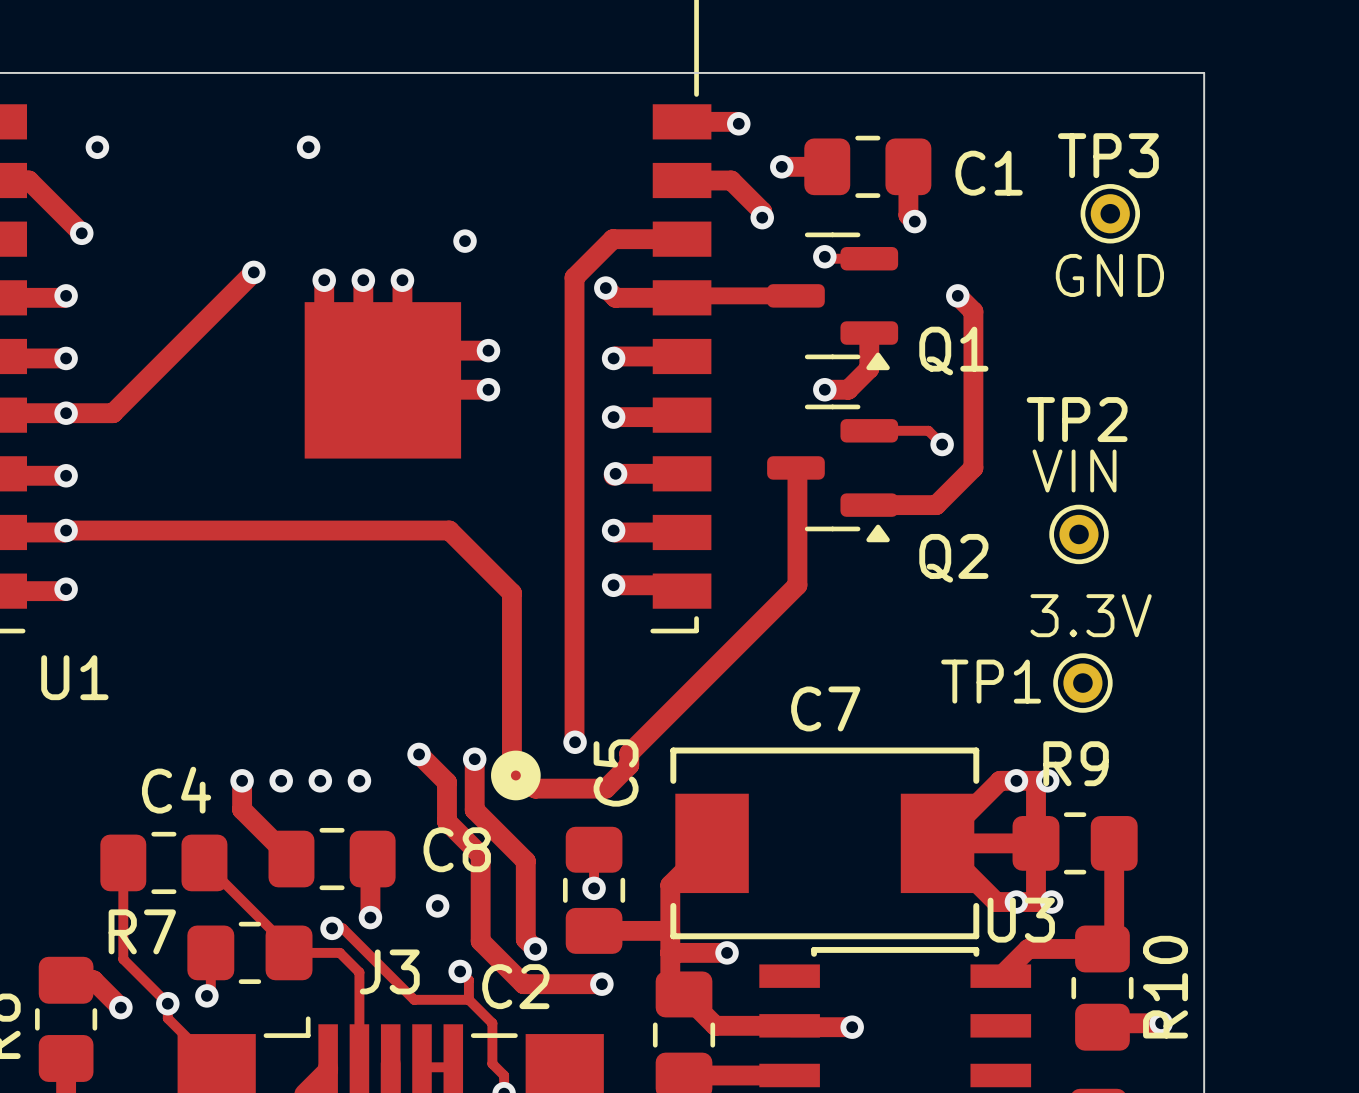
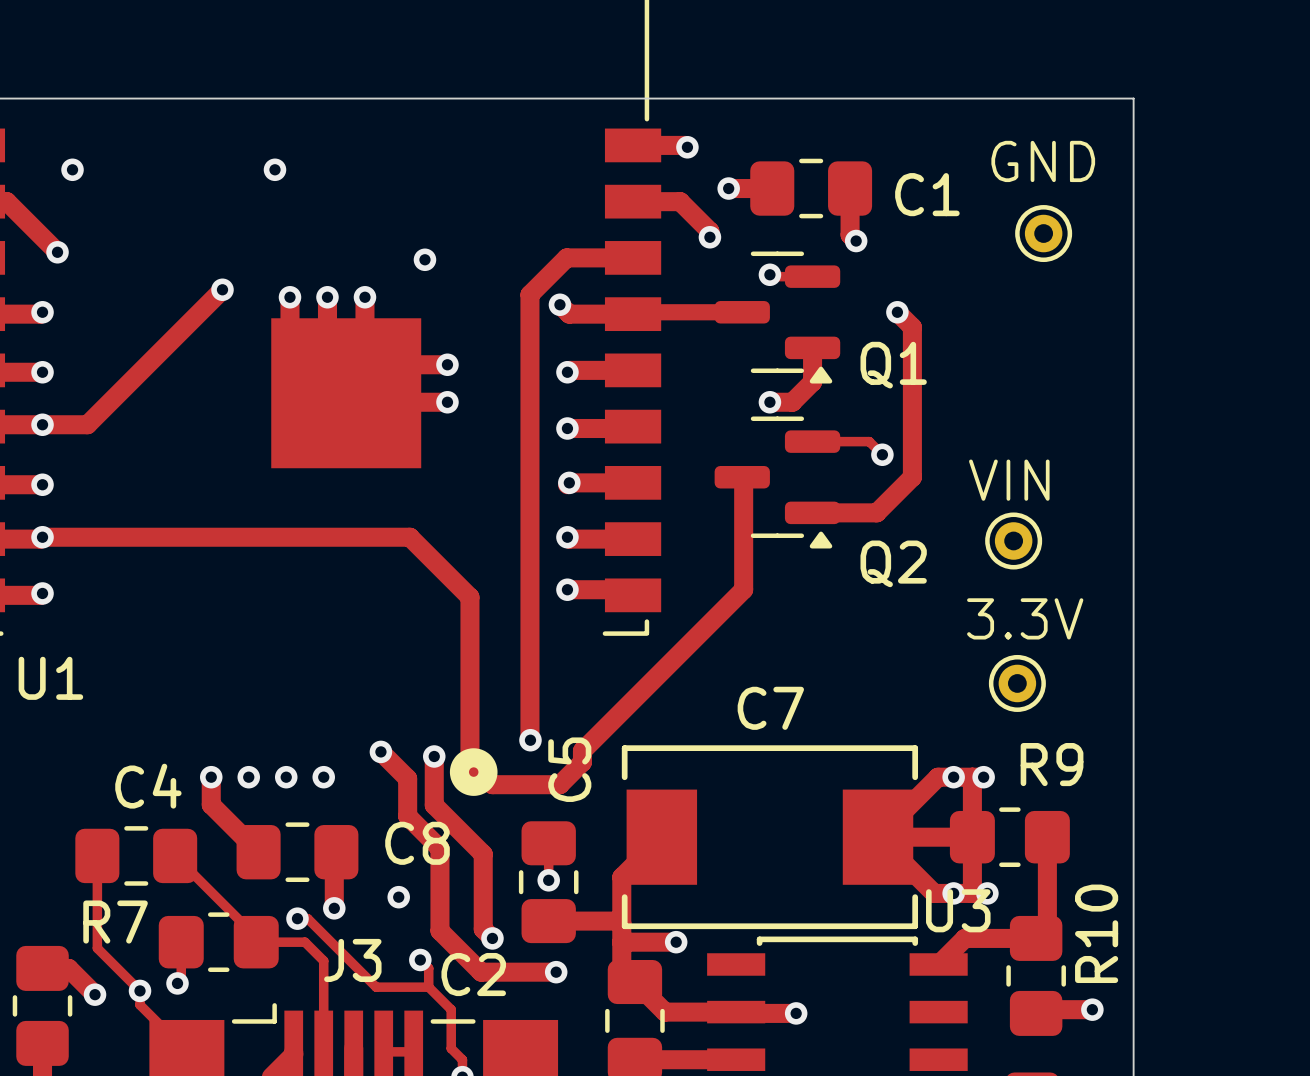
TP3 name: TP3 (1108, 155) -> none
text position: GND (1109, 275) -> GND (1043, 161)
TP2 name: TP2 (1077, 419) -> none
TP1 name: TP1 (991, 681) -> none
R9 name position: R9 (1076, 763) -> R9 (1052, 764)
R10 name position: R10 (1165, 987) -> R10 (1096, 933)

